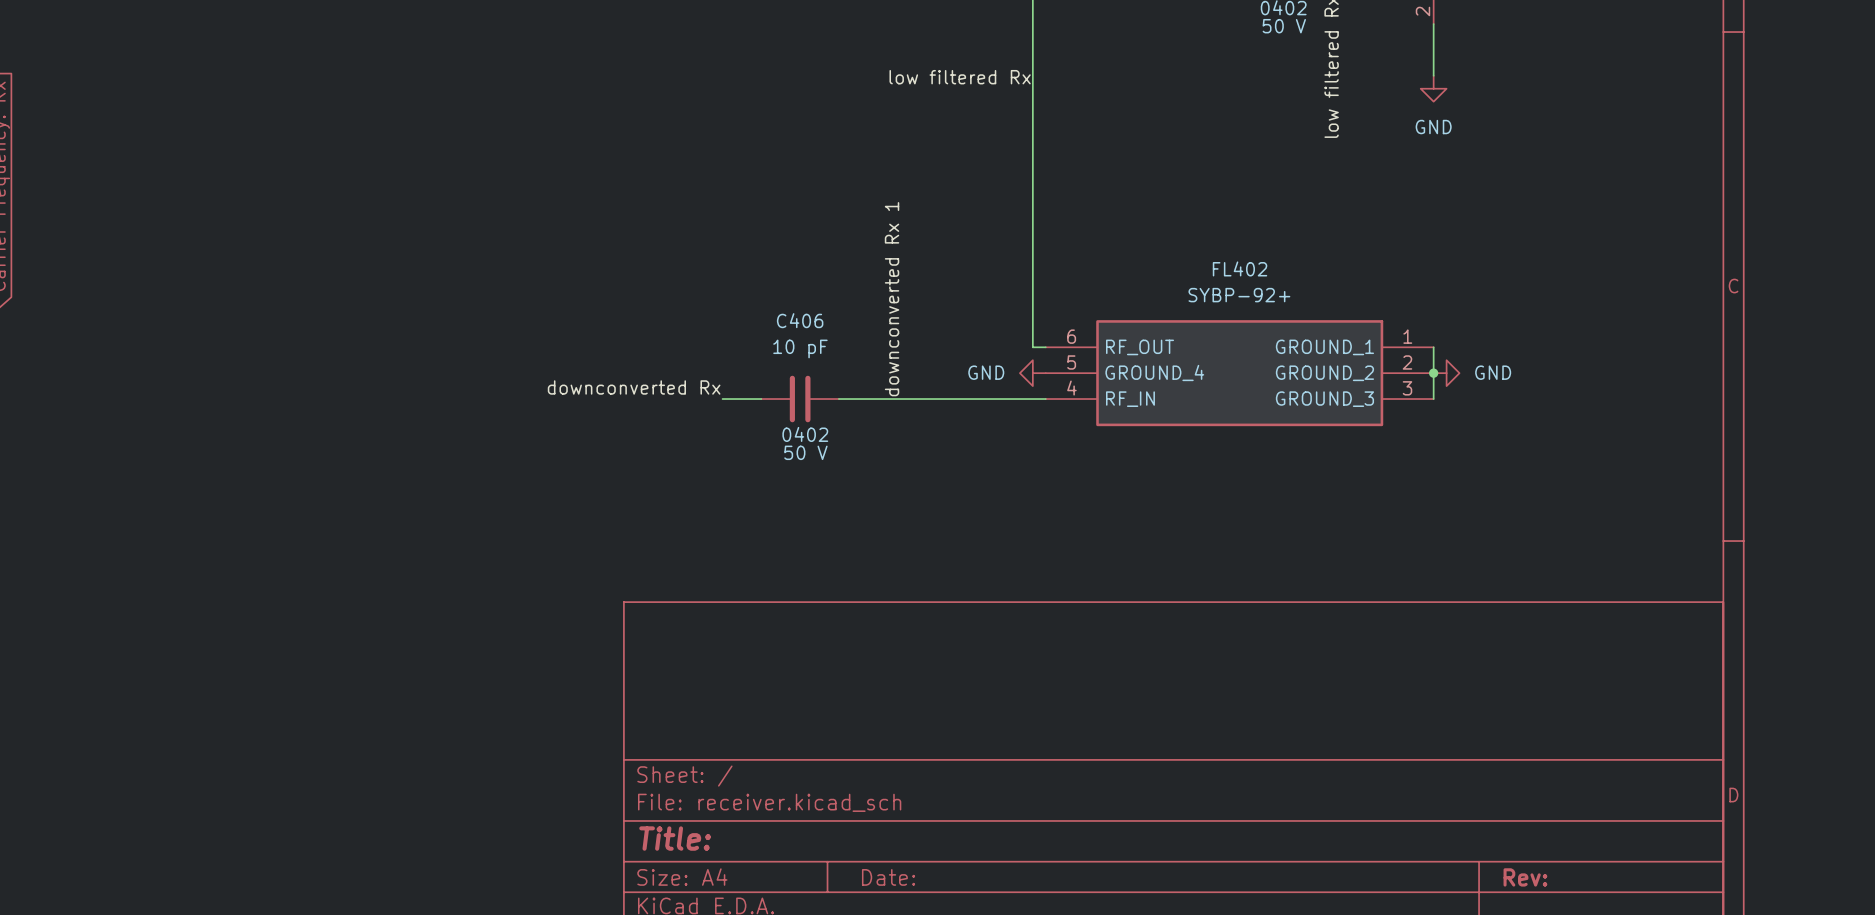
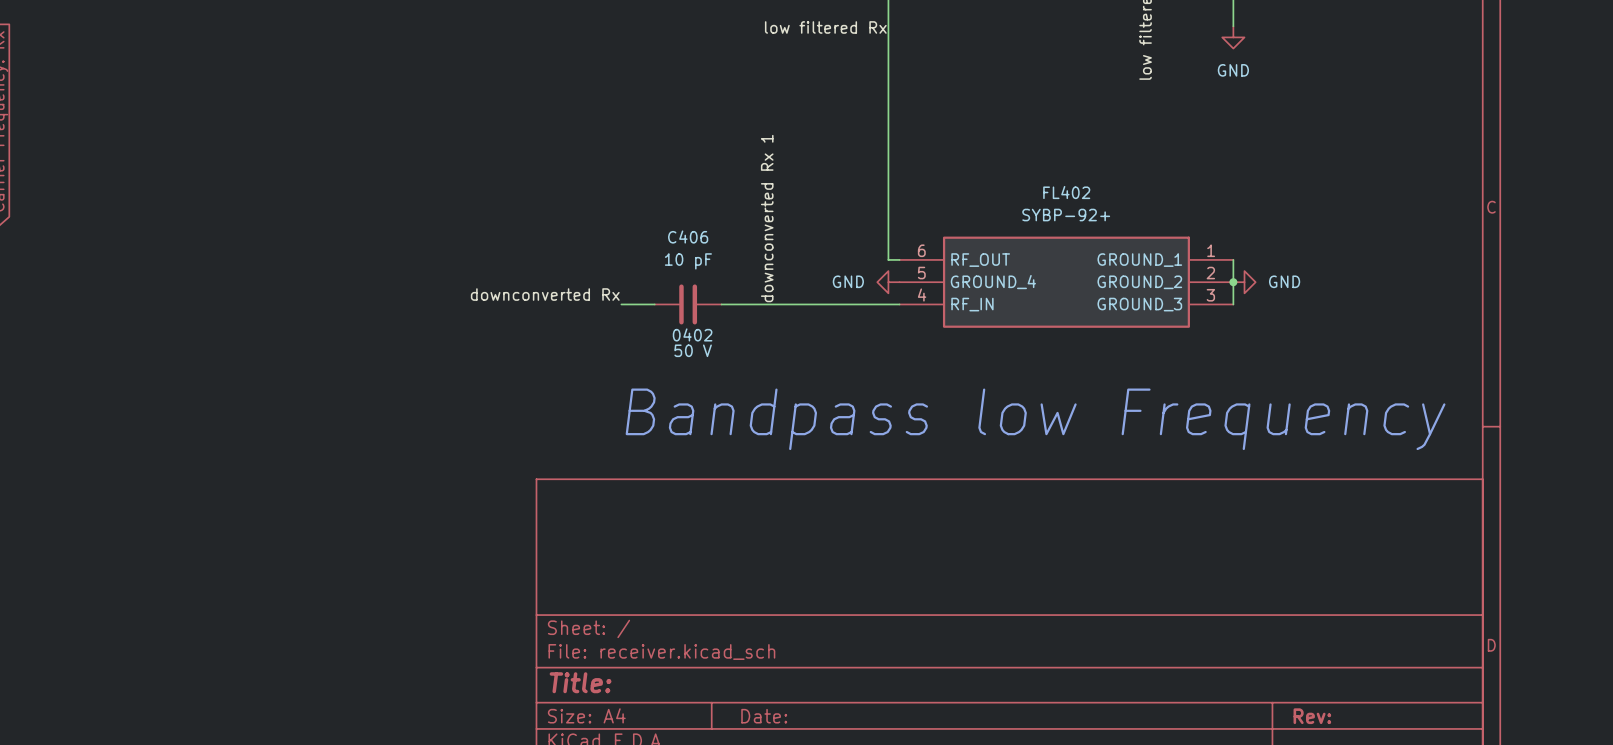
text: none -> Bandpass low Frequency (1035, 419)

